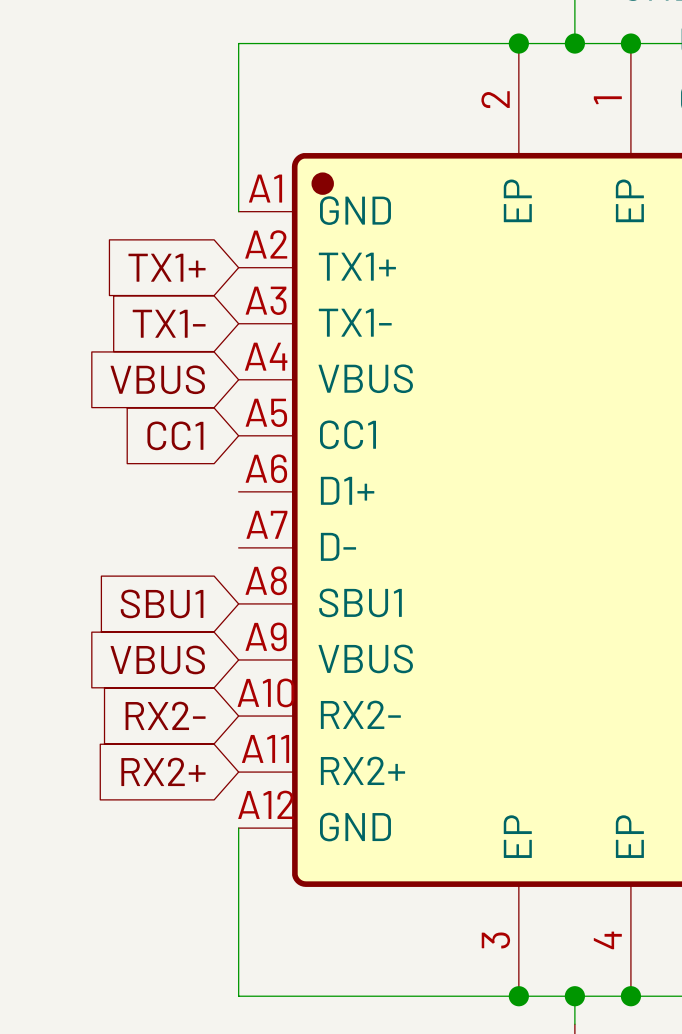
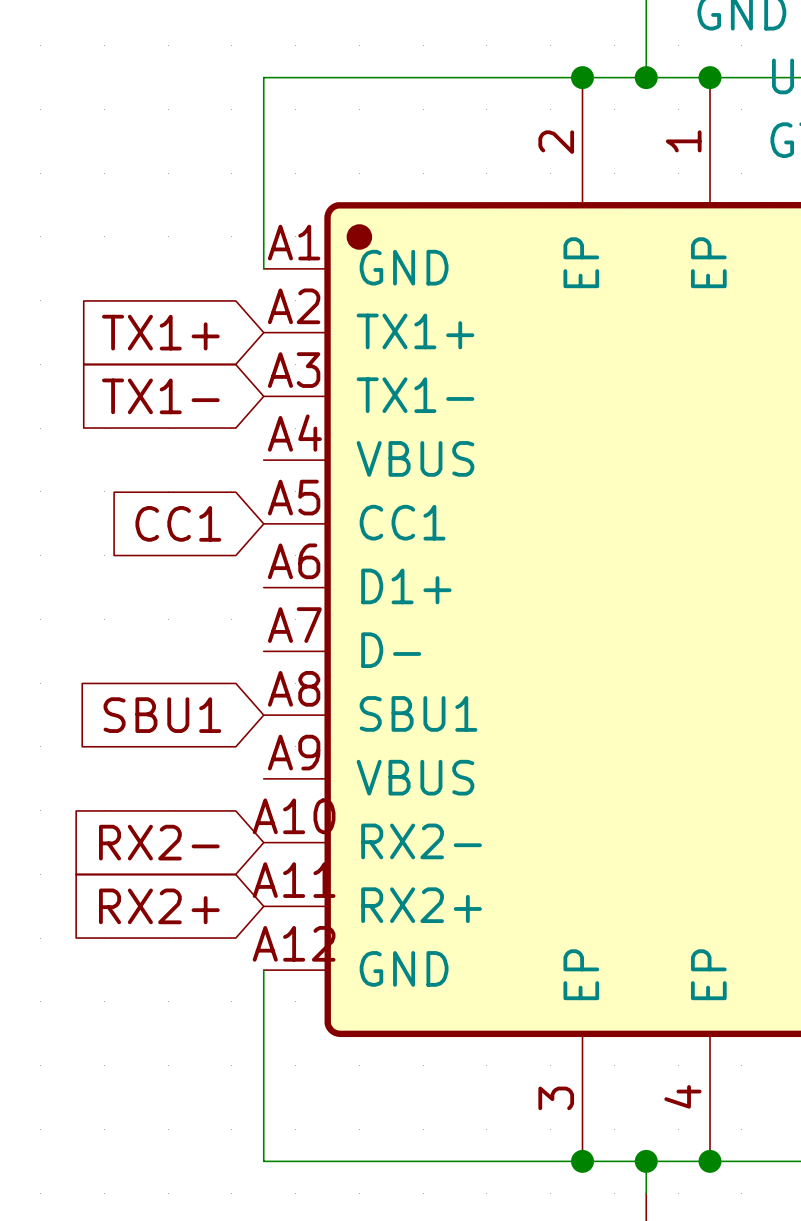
global label: VBUS (157, 379) -> none
global label: VBUS (157, 659) -> none

